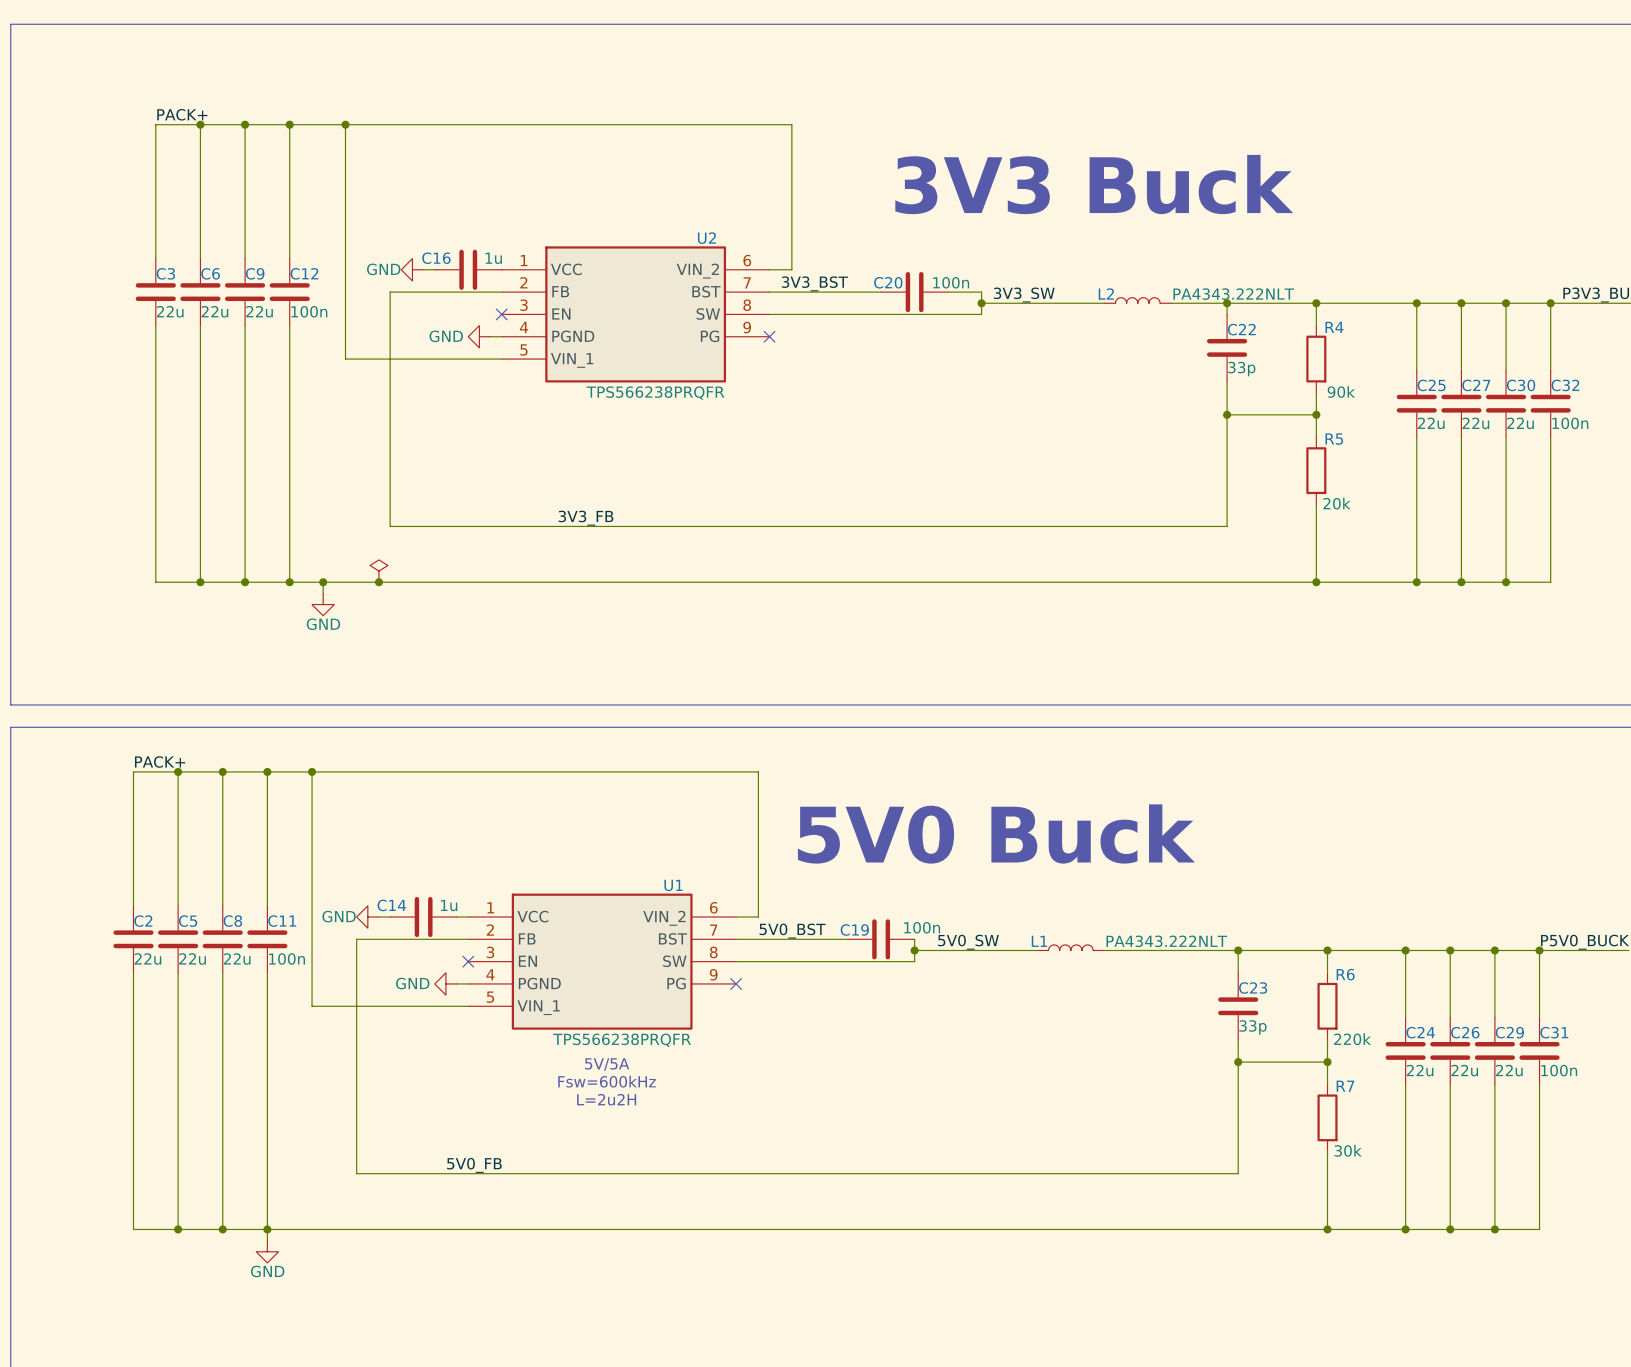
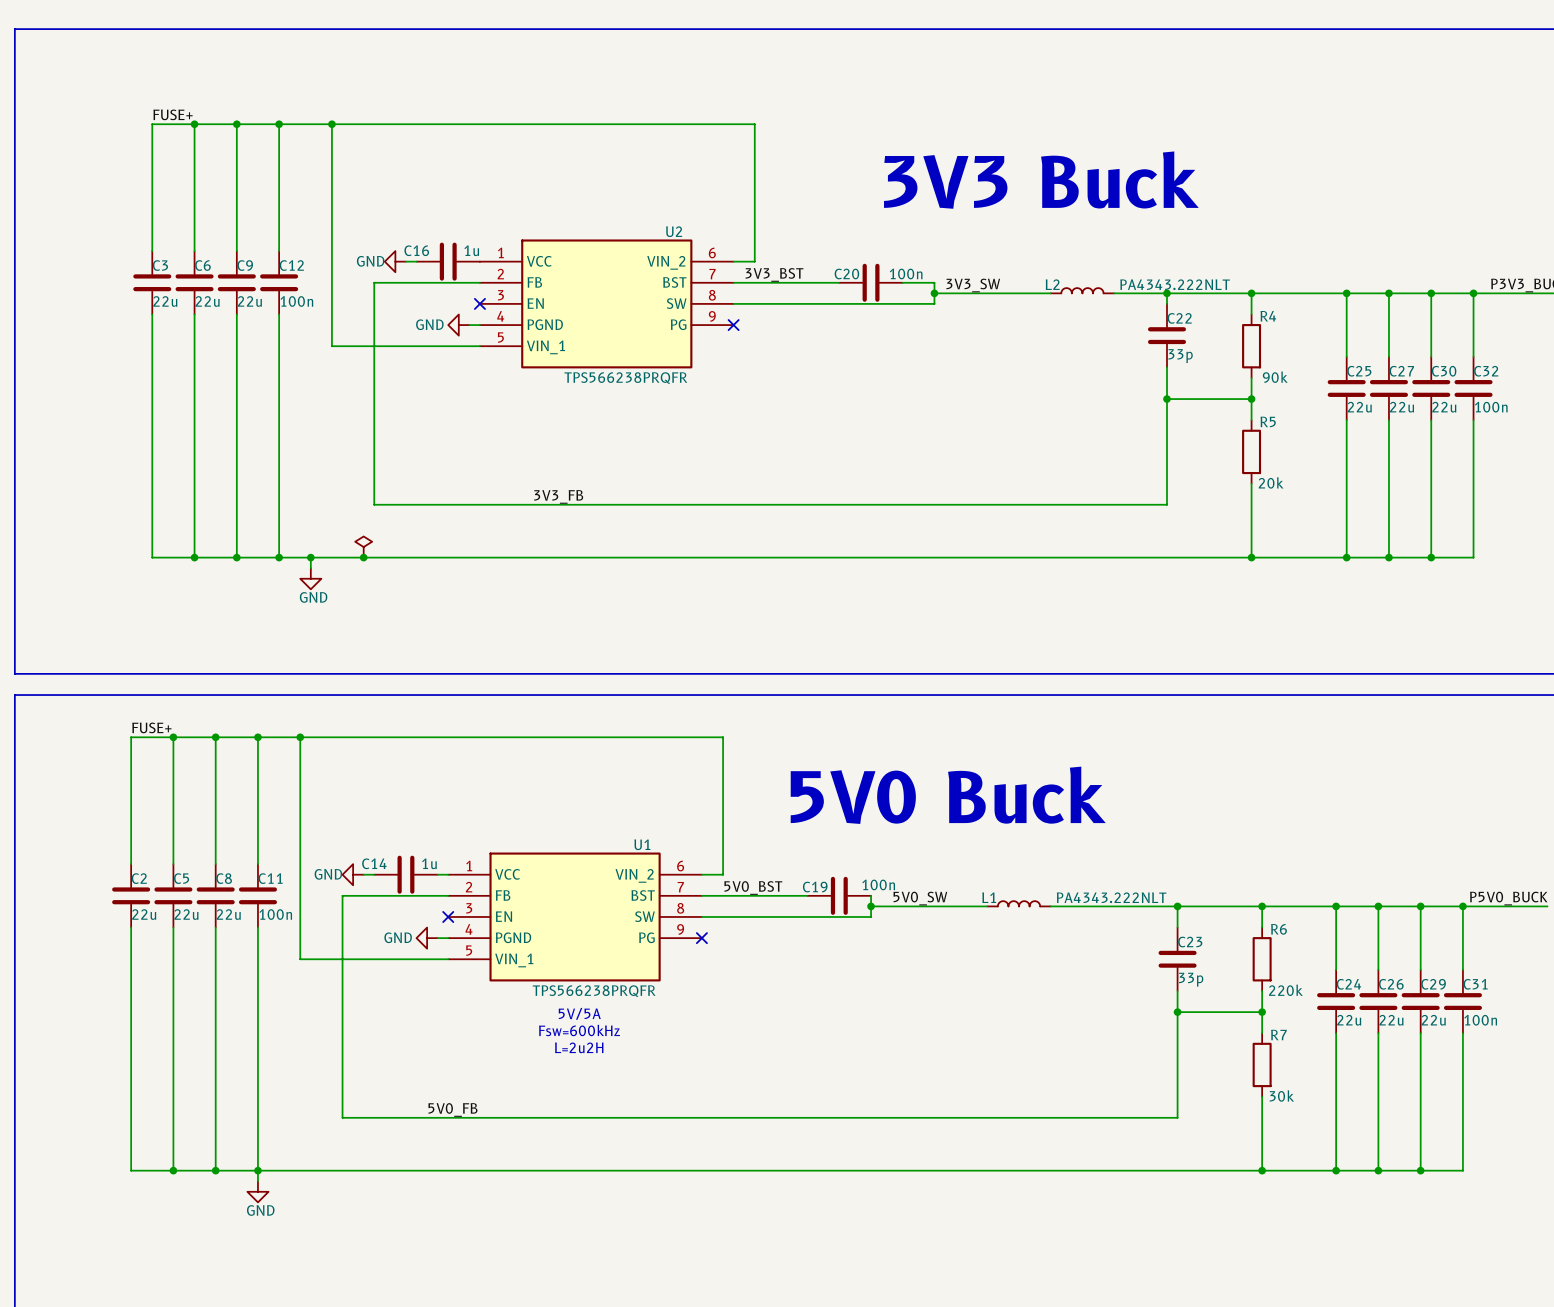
label: PACK+ (182, 114) -> FUSE+ (173, 114)
label: PACK+ (160, 761) -> FUSE+ (151, 727)

